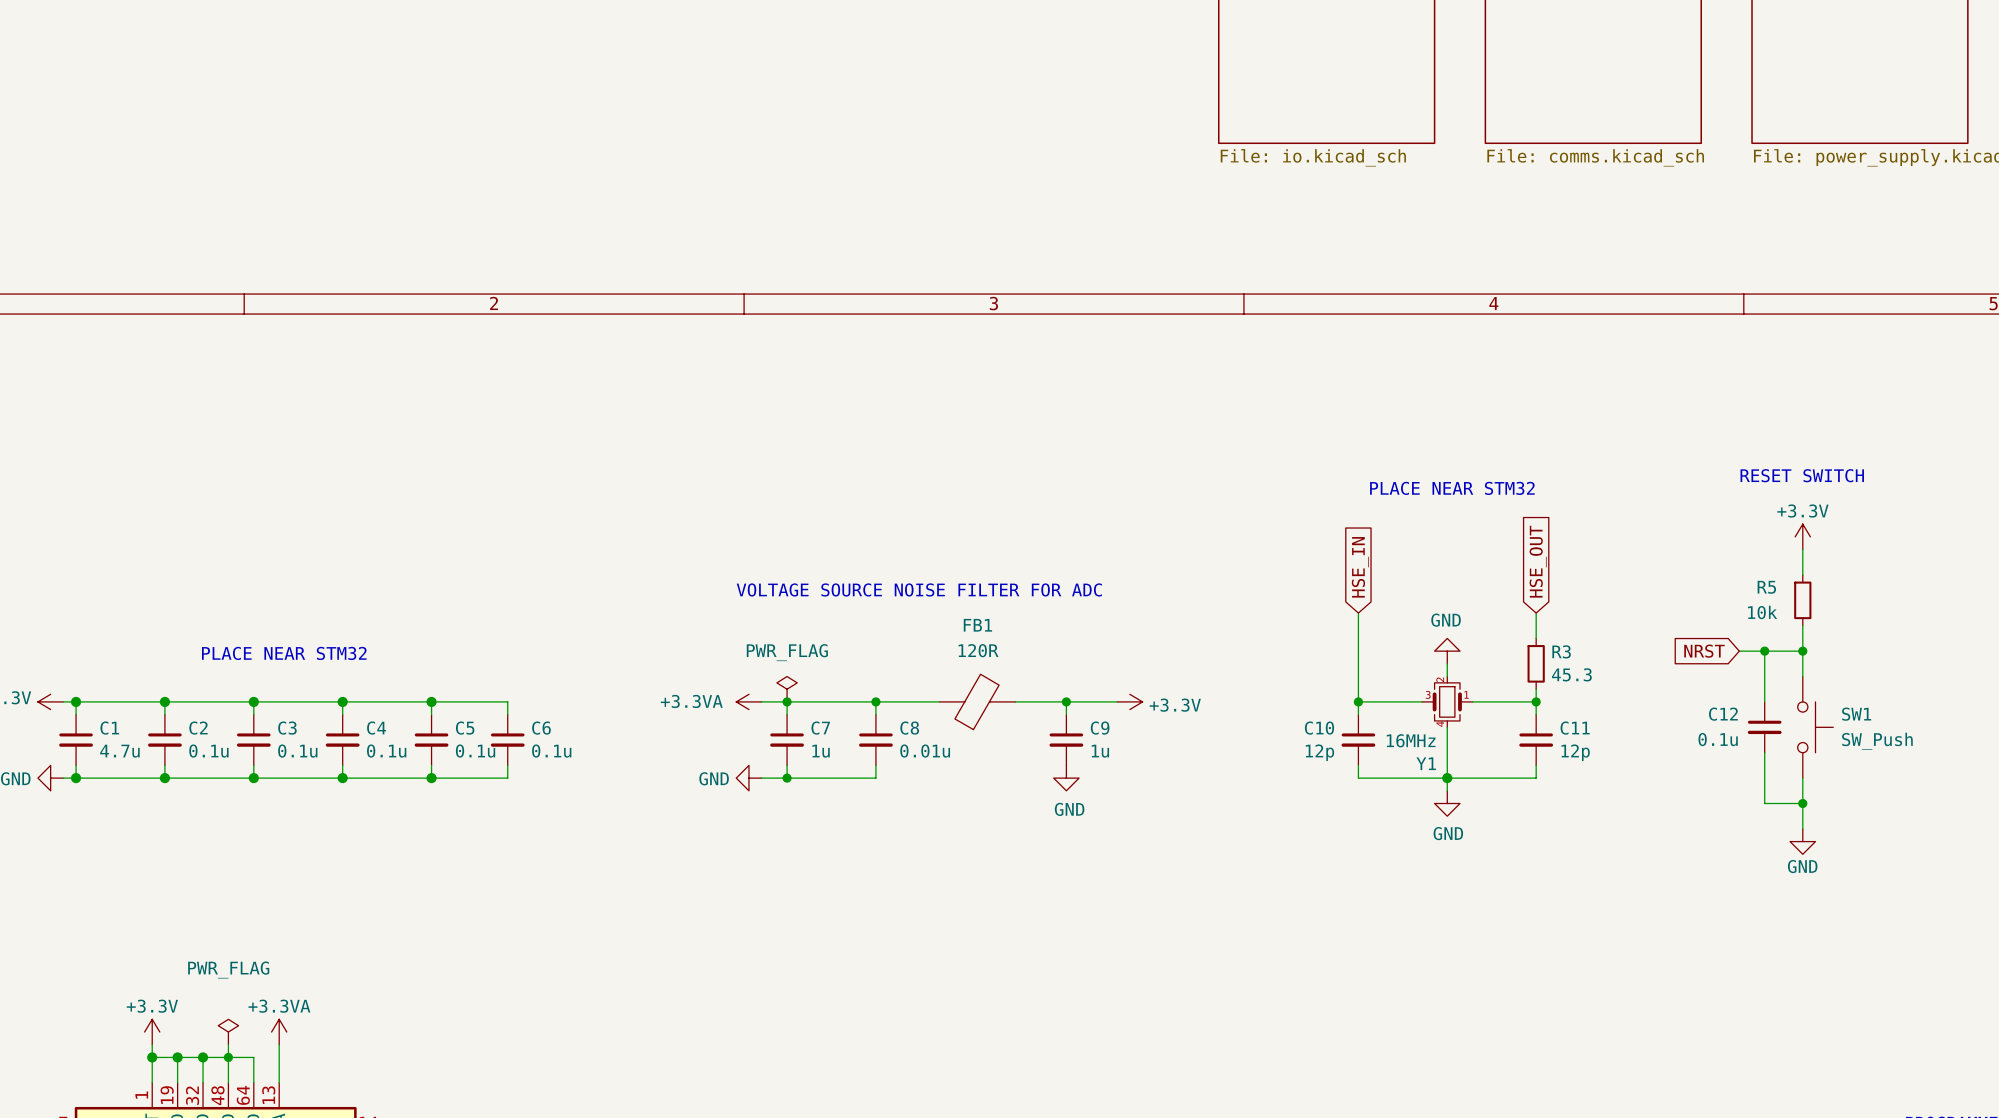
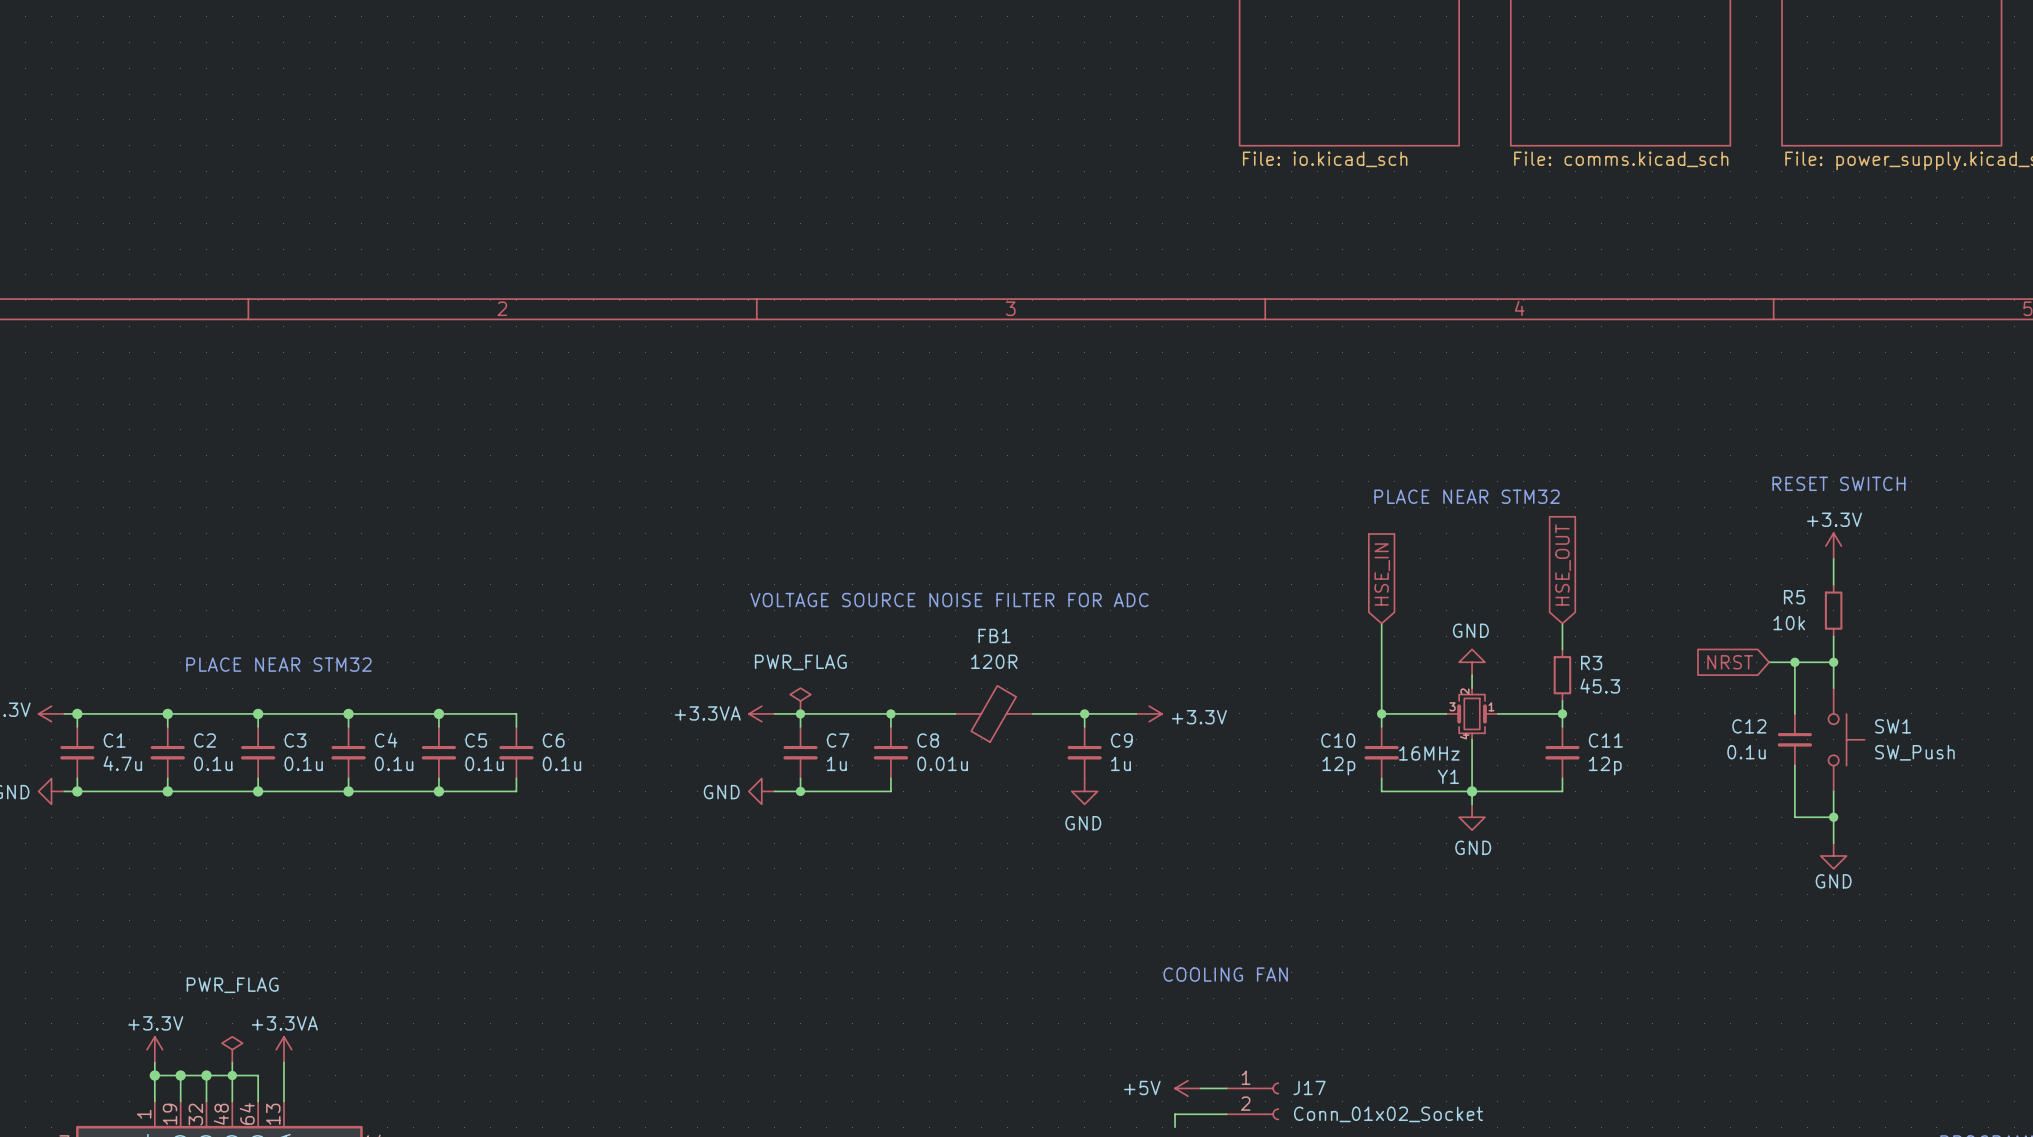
text: none -> COOLING FAN (1225, 974)
power symbol: none -> +5V (1187, 1088)
wire: none -> (1200, 1088) (1226, 1088)
J17: none -> Conn_01x02_Socket (1252, 1101)
wire: none -> (1226, 1114) (1175, 1114) (1175, 1127)

